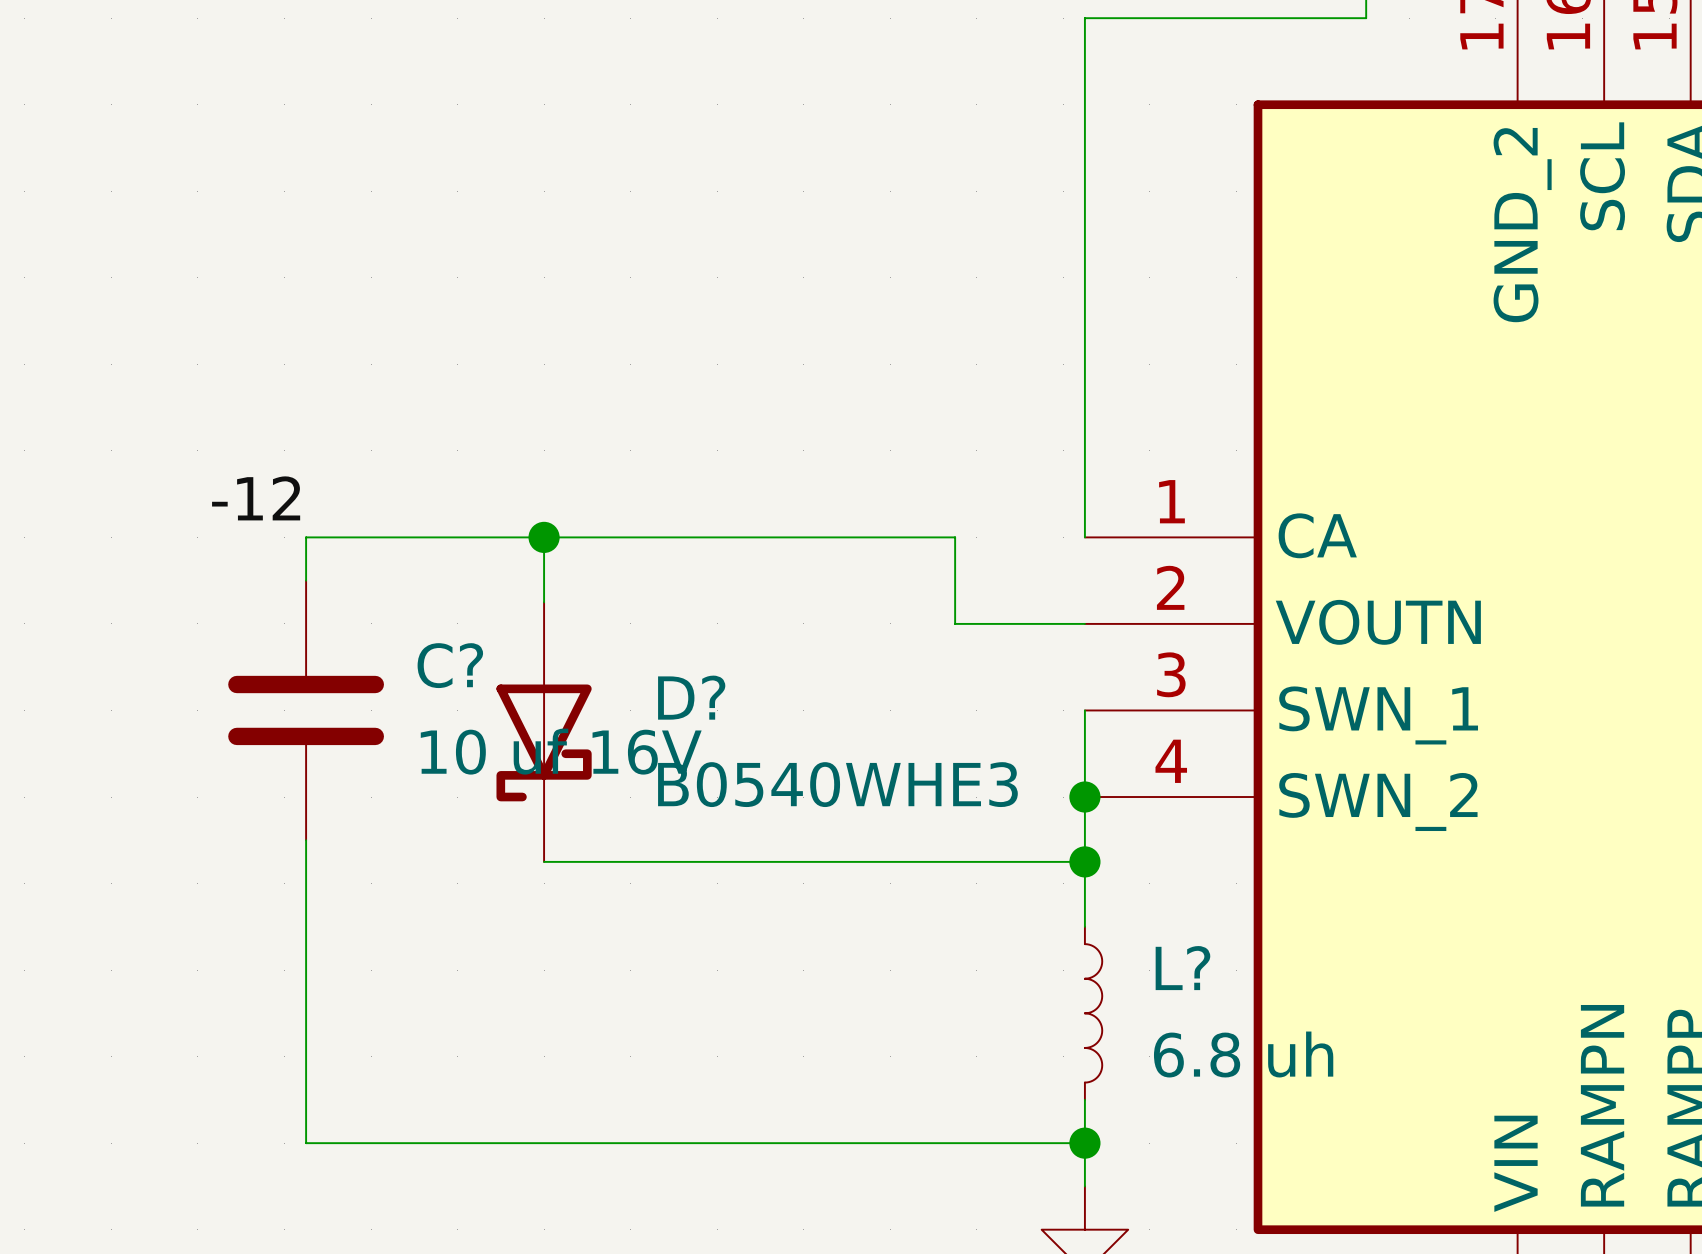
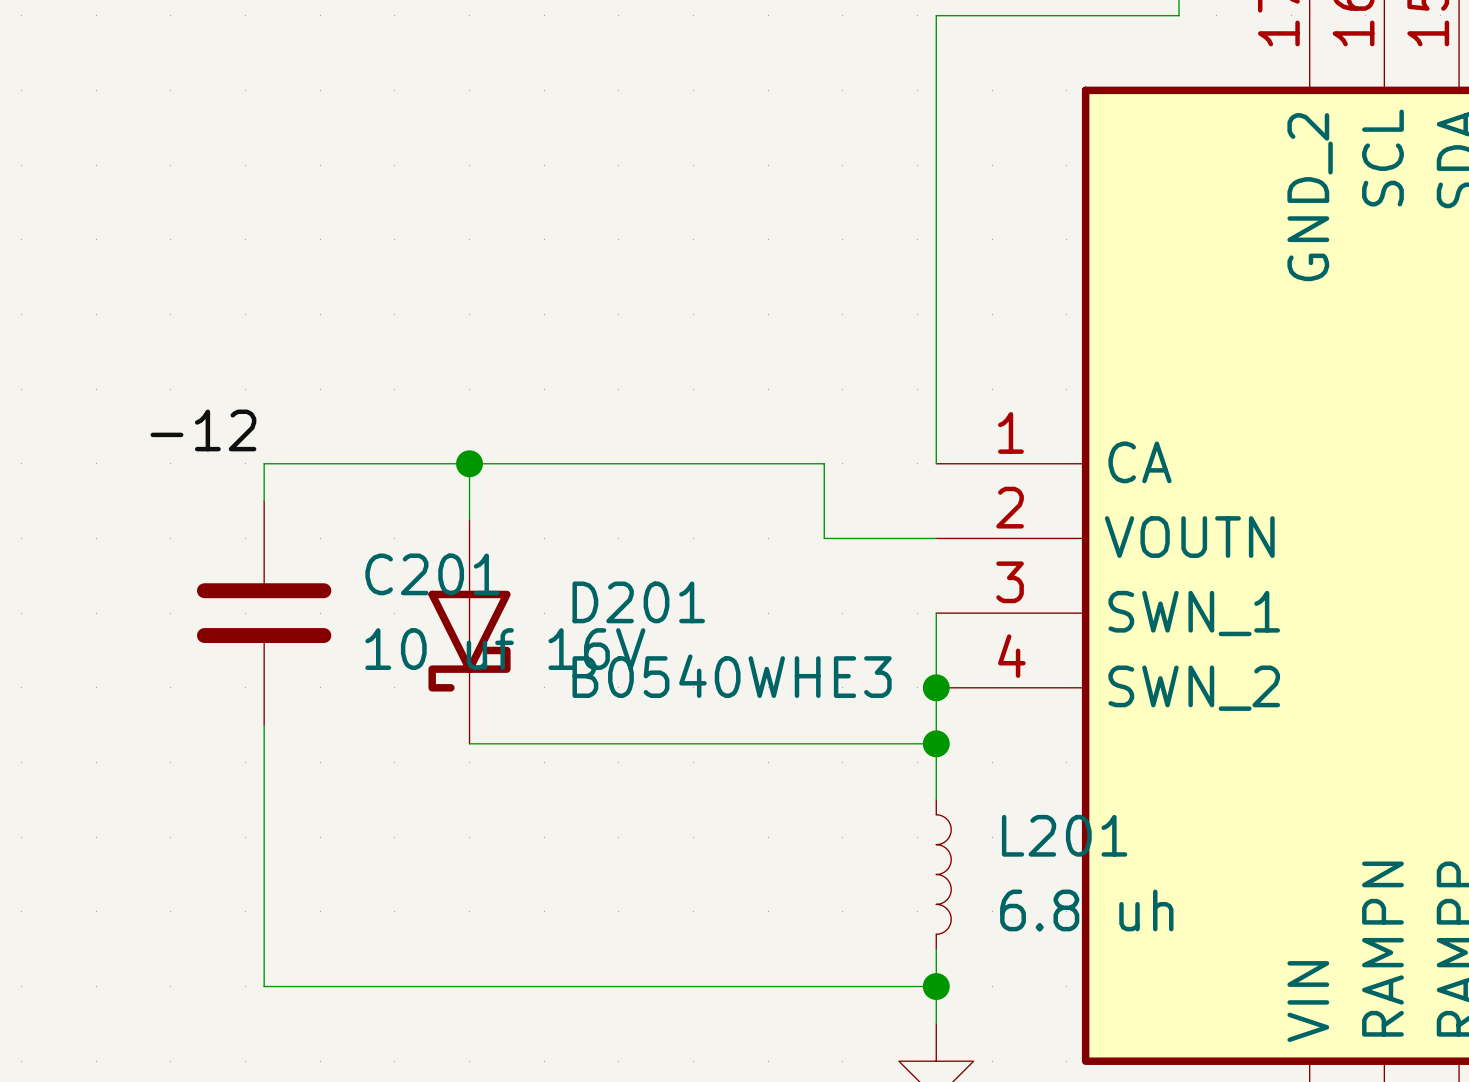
C? name: C? (450, 665) -> C201 (432, 574)
D? name: D? (691, 697) -> D201 (638, 602)
L? name: L? (1182, 968) -> L201 (1064, 835)

